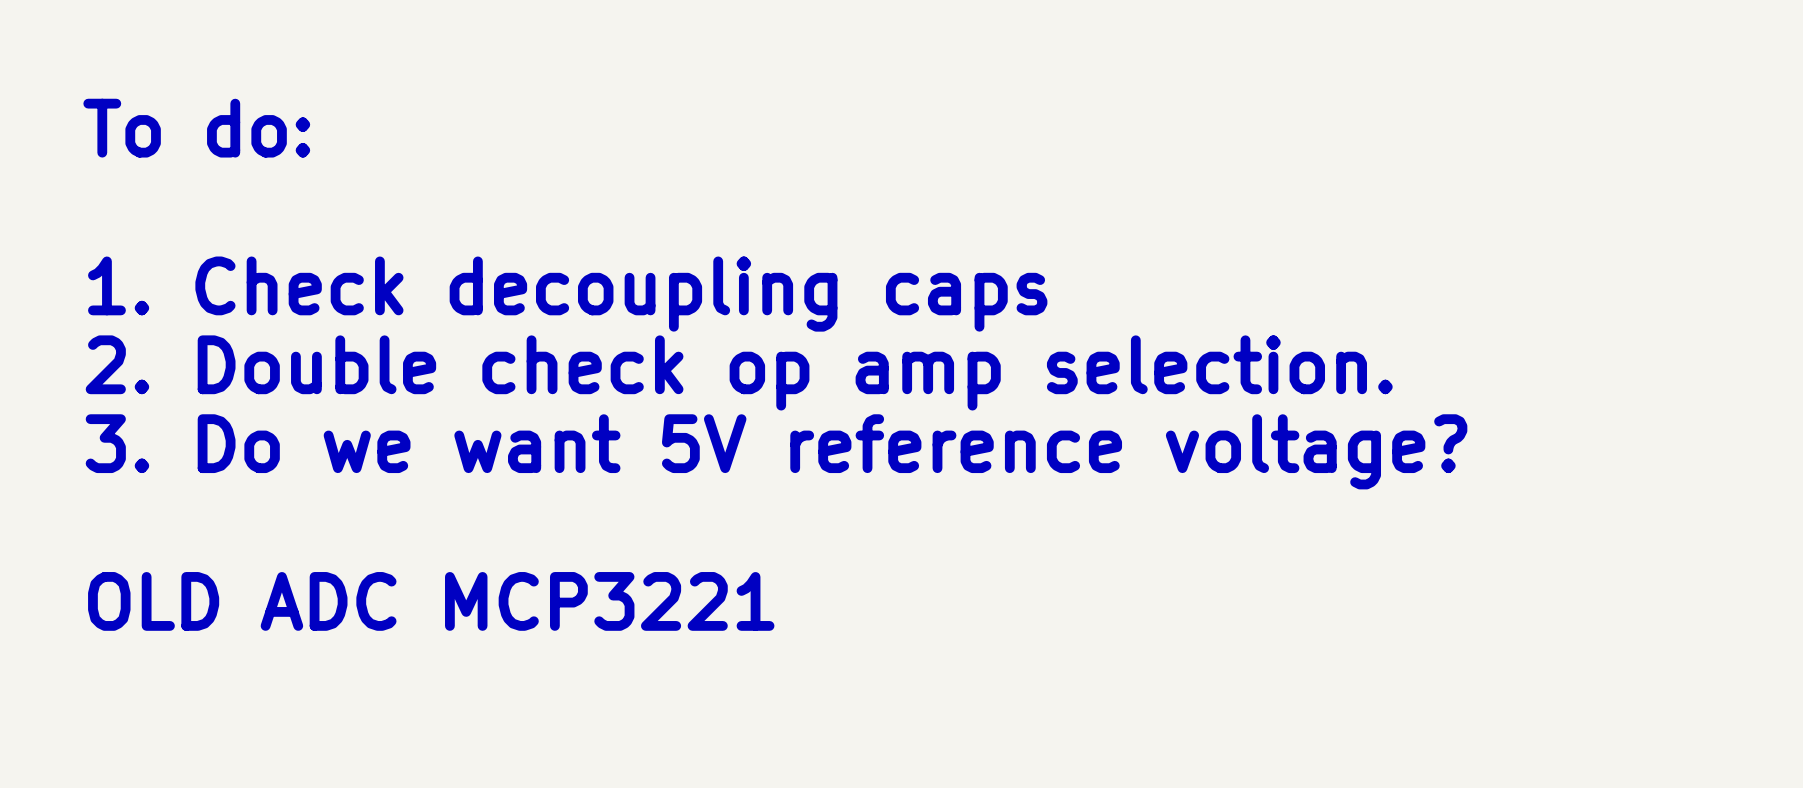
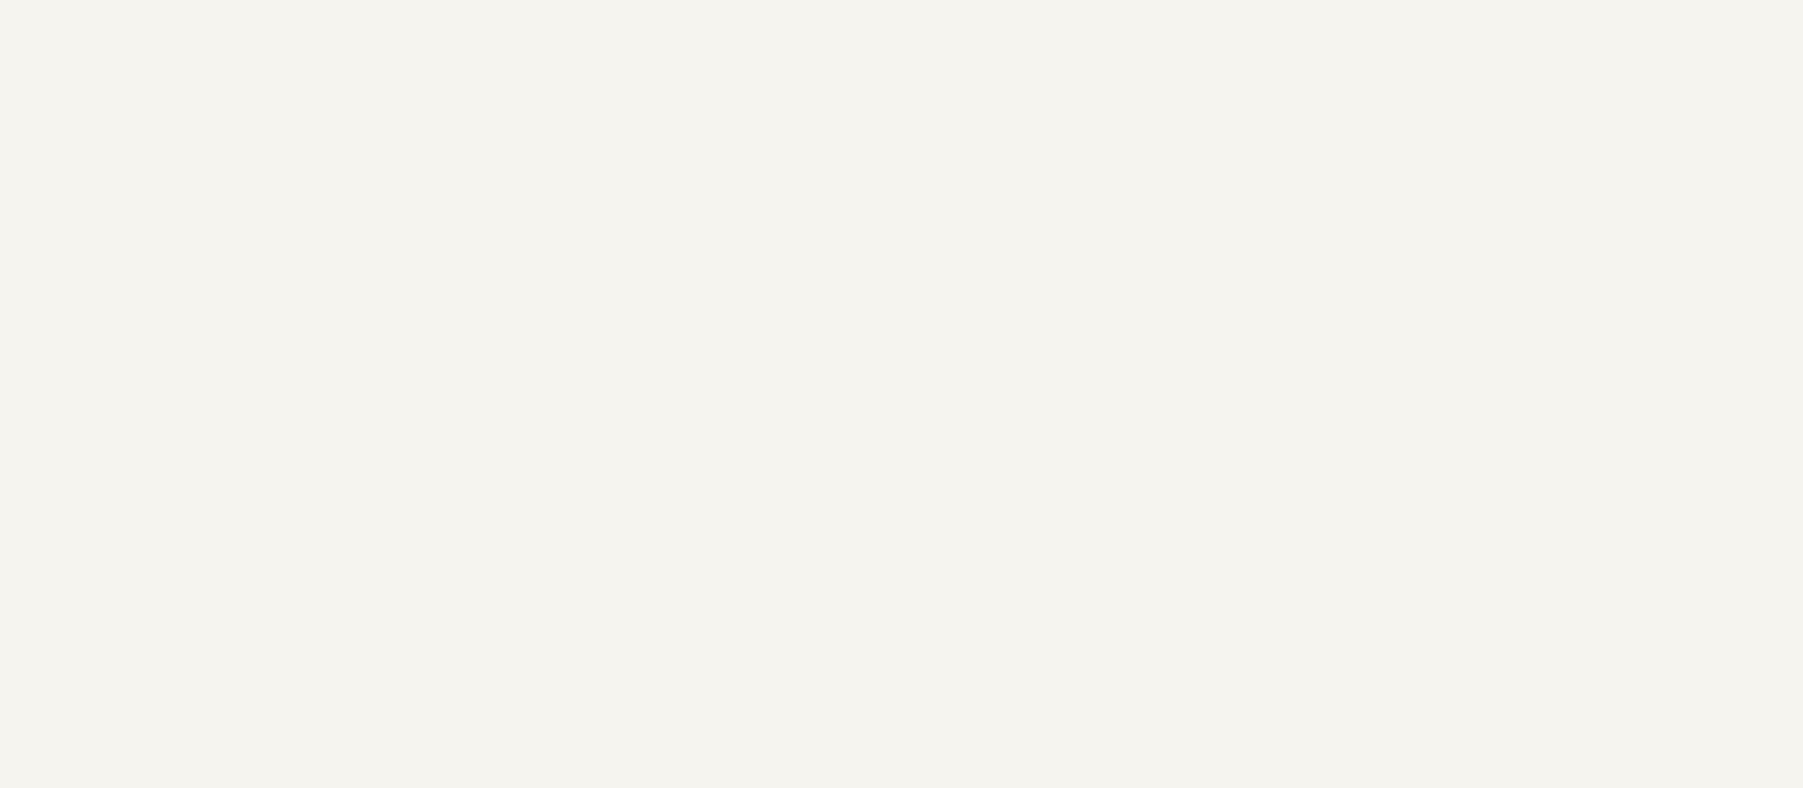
text: To do: (196, 128) -> none
text: 1. Check decoupling caps (567, 294) -> none
text: 2. Double check op amp selection. (739, 372) -> none
text: 3. Do we want 5V reference voltage? (776, 451) -> none
text: OLD ADC MCP3221 (431, 601) -> none

